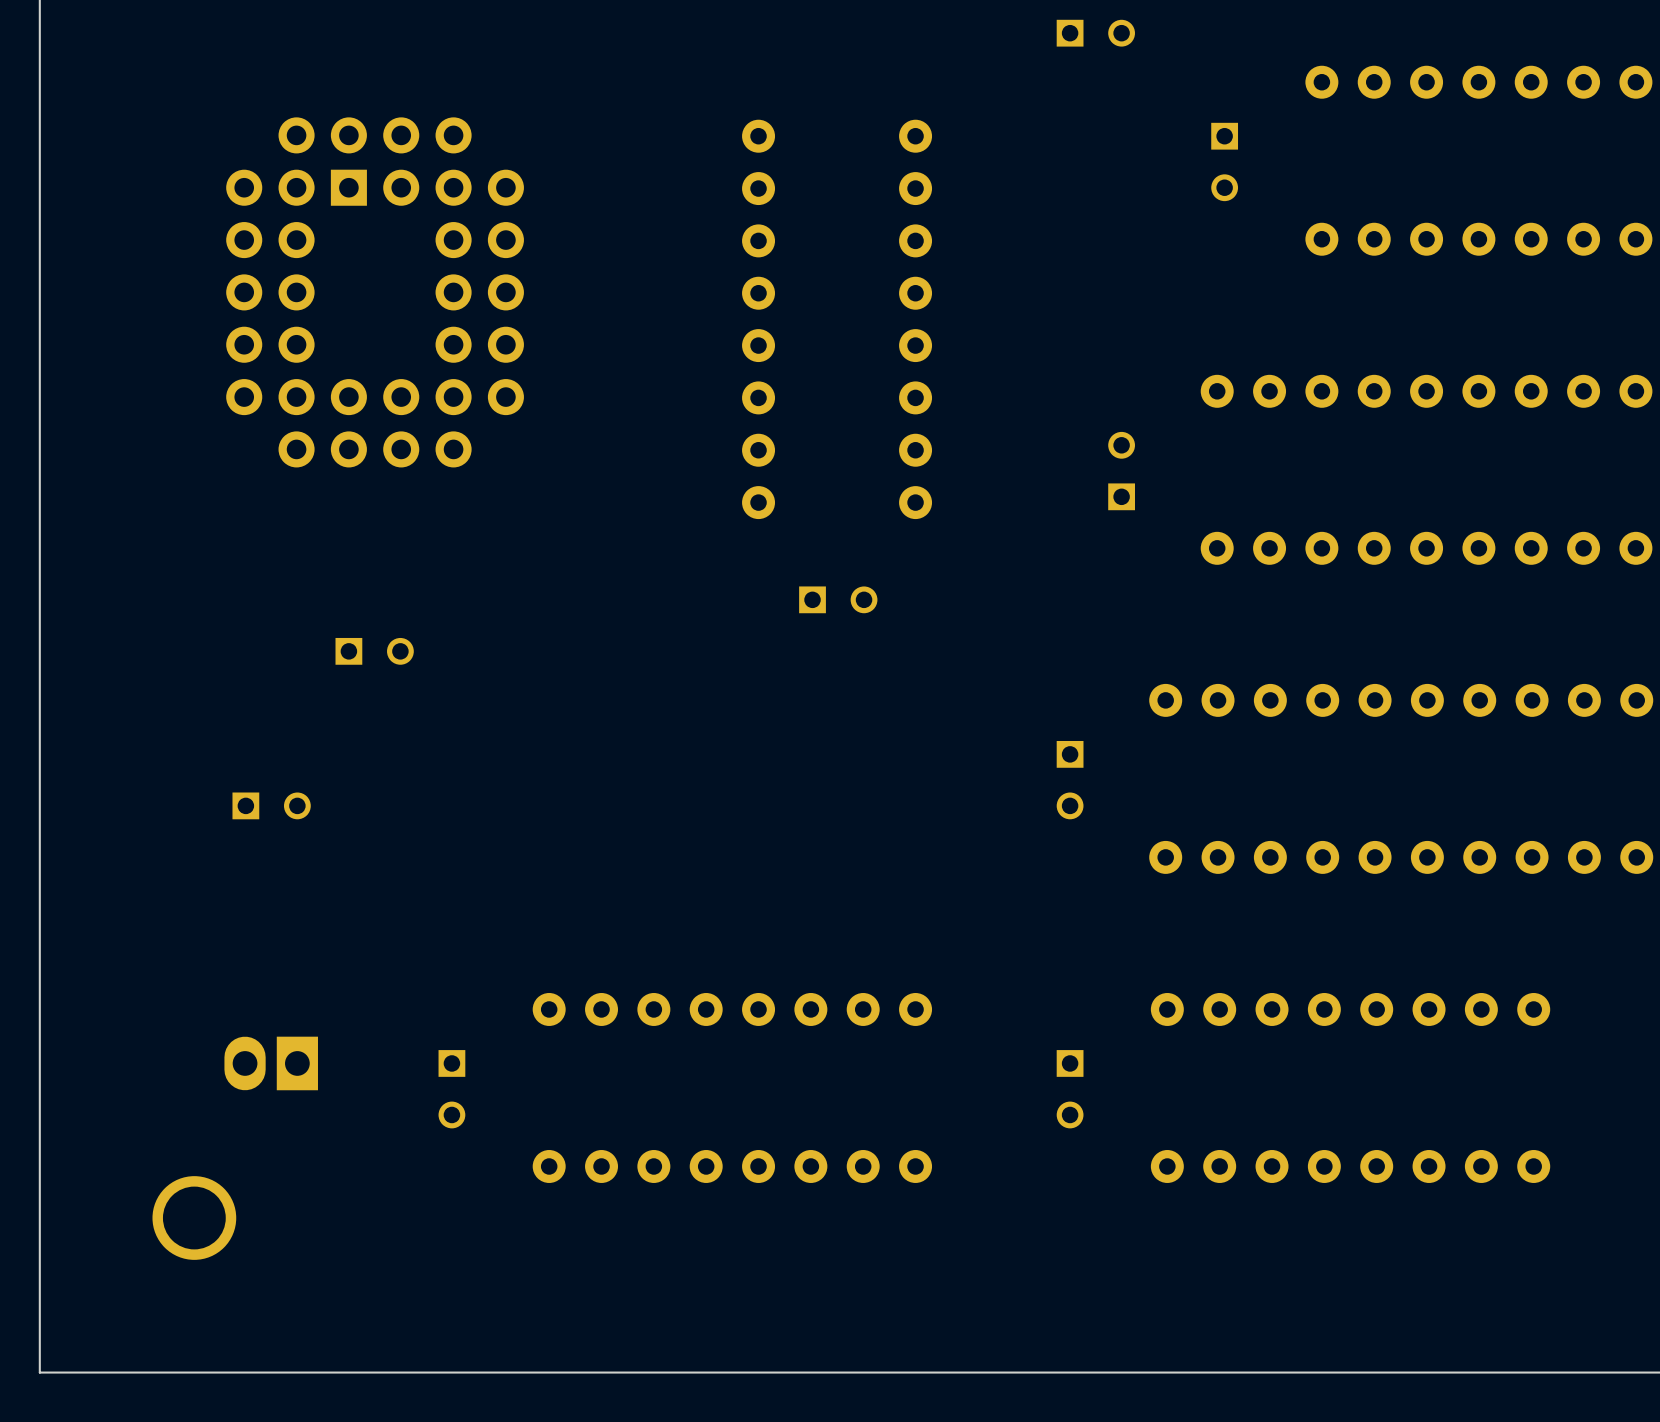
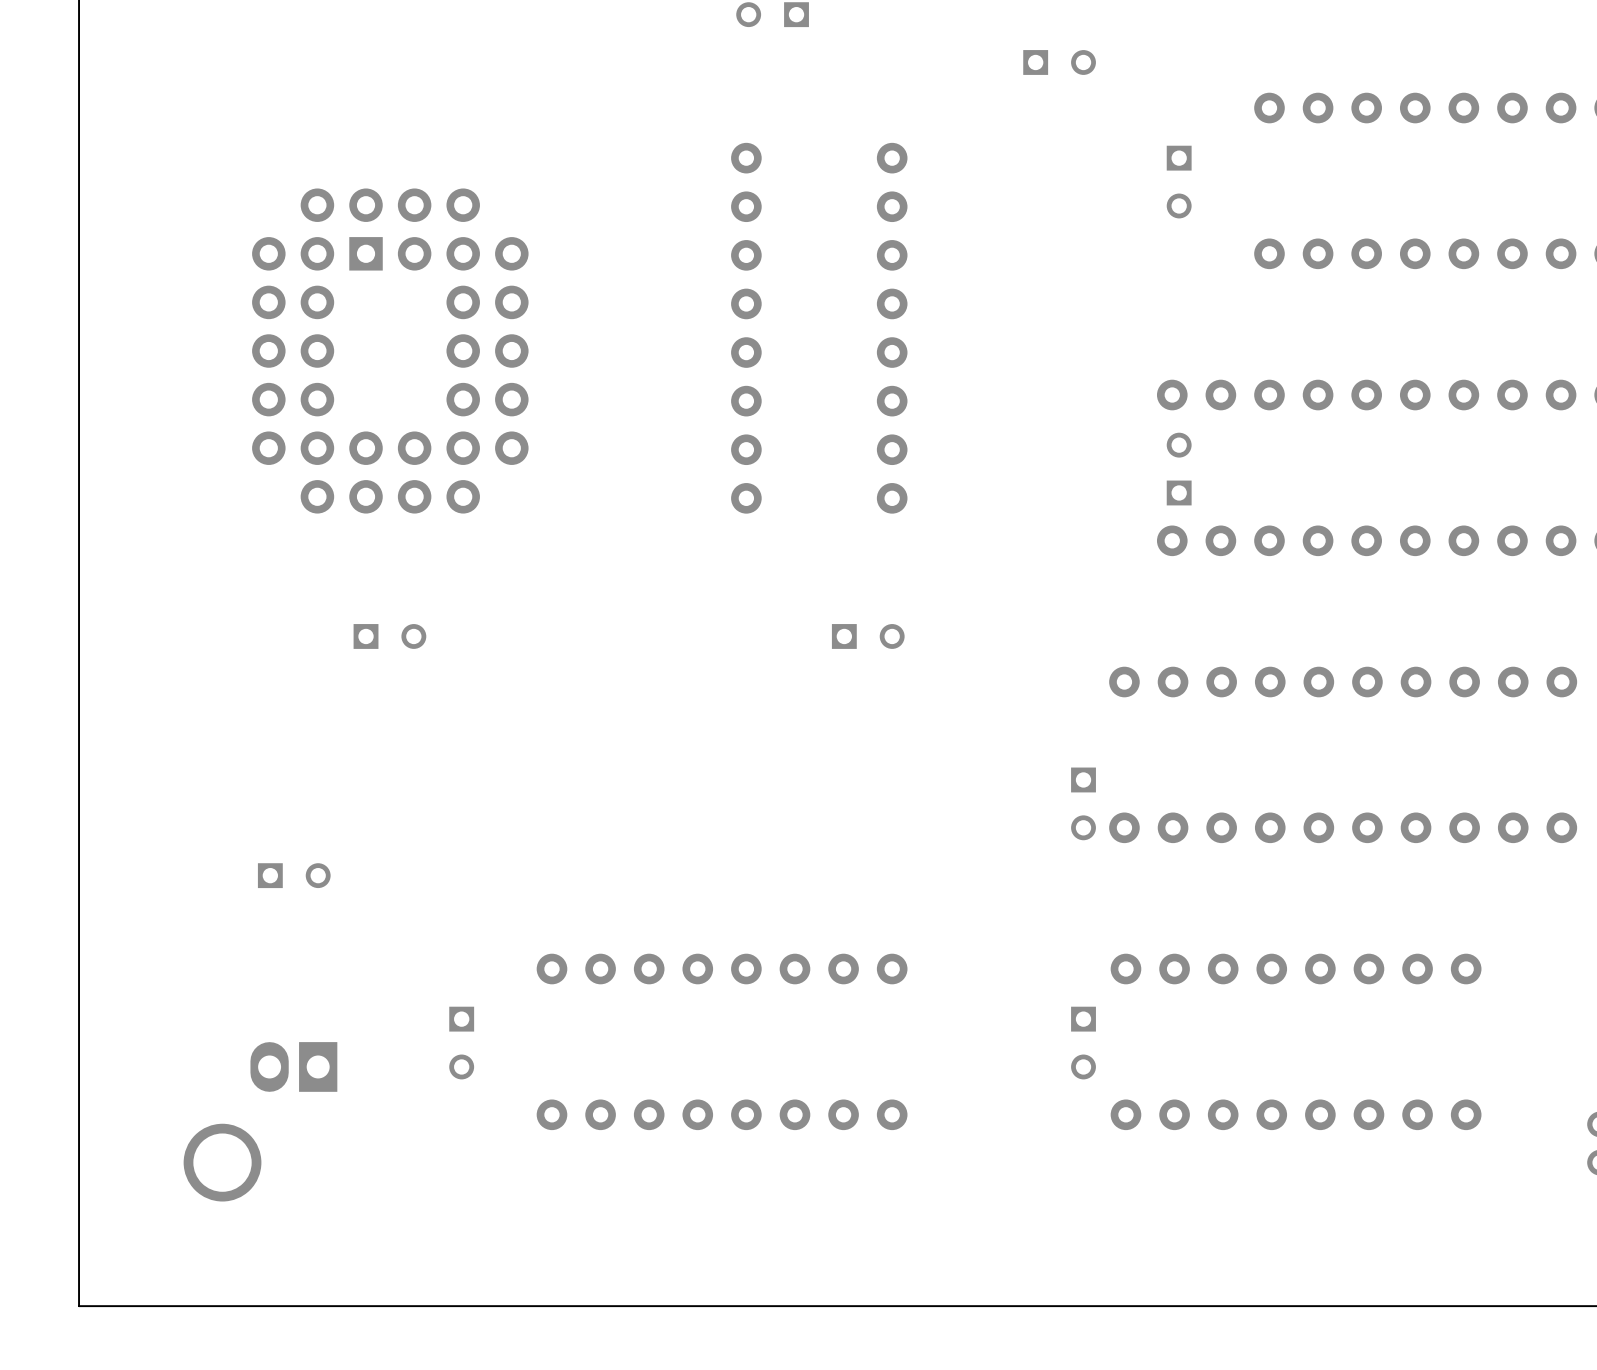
part position: (375, 292) -> (390, 351)
part position: (1121, 471) -> (1179, 469)
part position: (838, 599) -> (868, 636)
part position: (1070, 780) -> (1083, 803)
part position: (271, 805) -> (294, 875)
part position: (271, 1063) -> (293, 1066)
part position: (1070, 1089) -> (1083, 1043)

